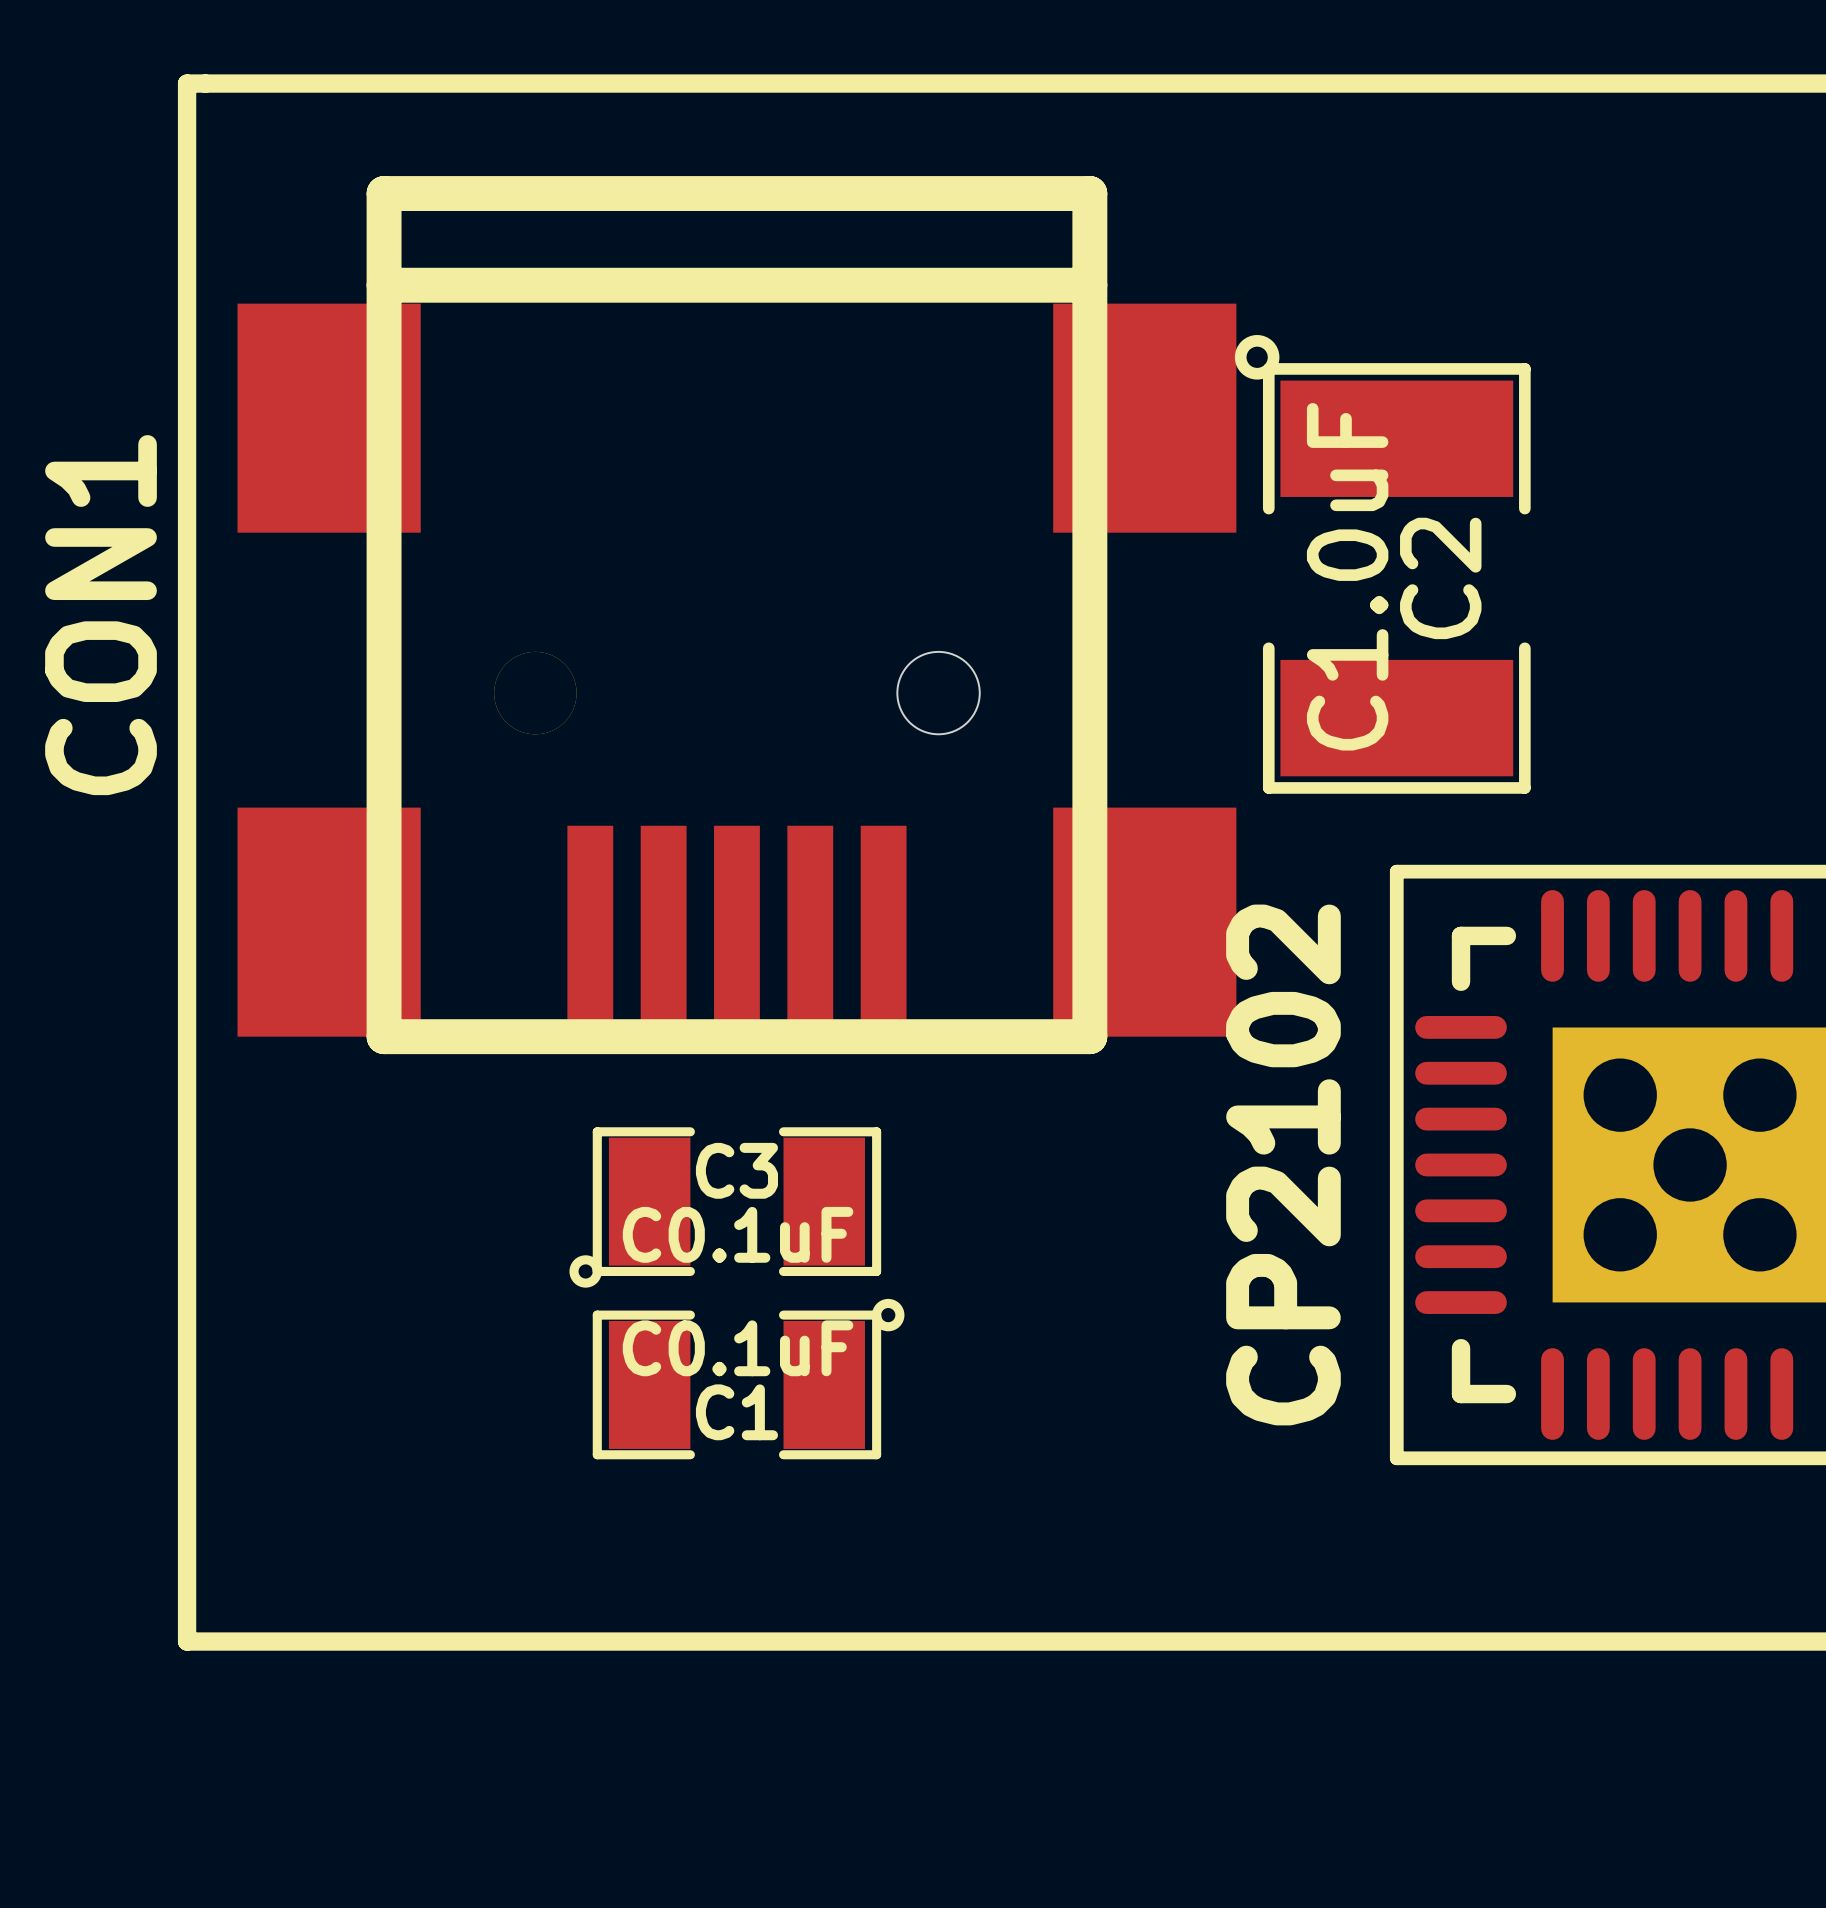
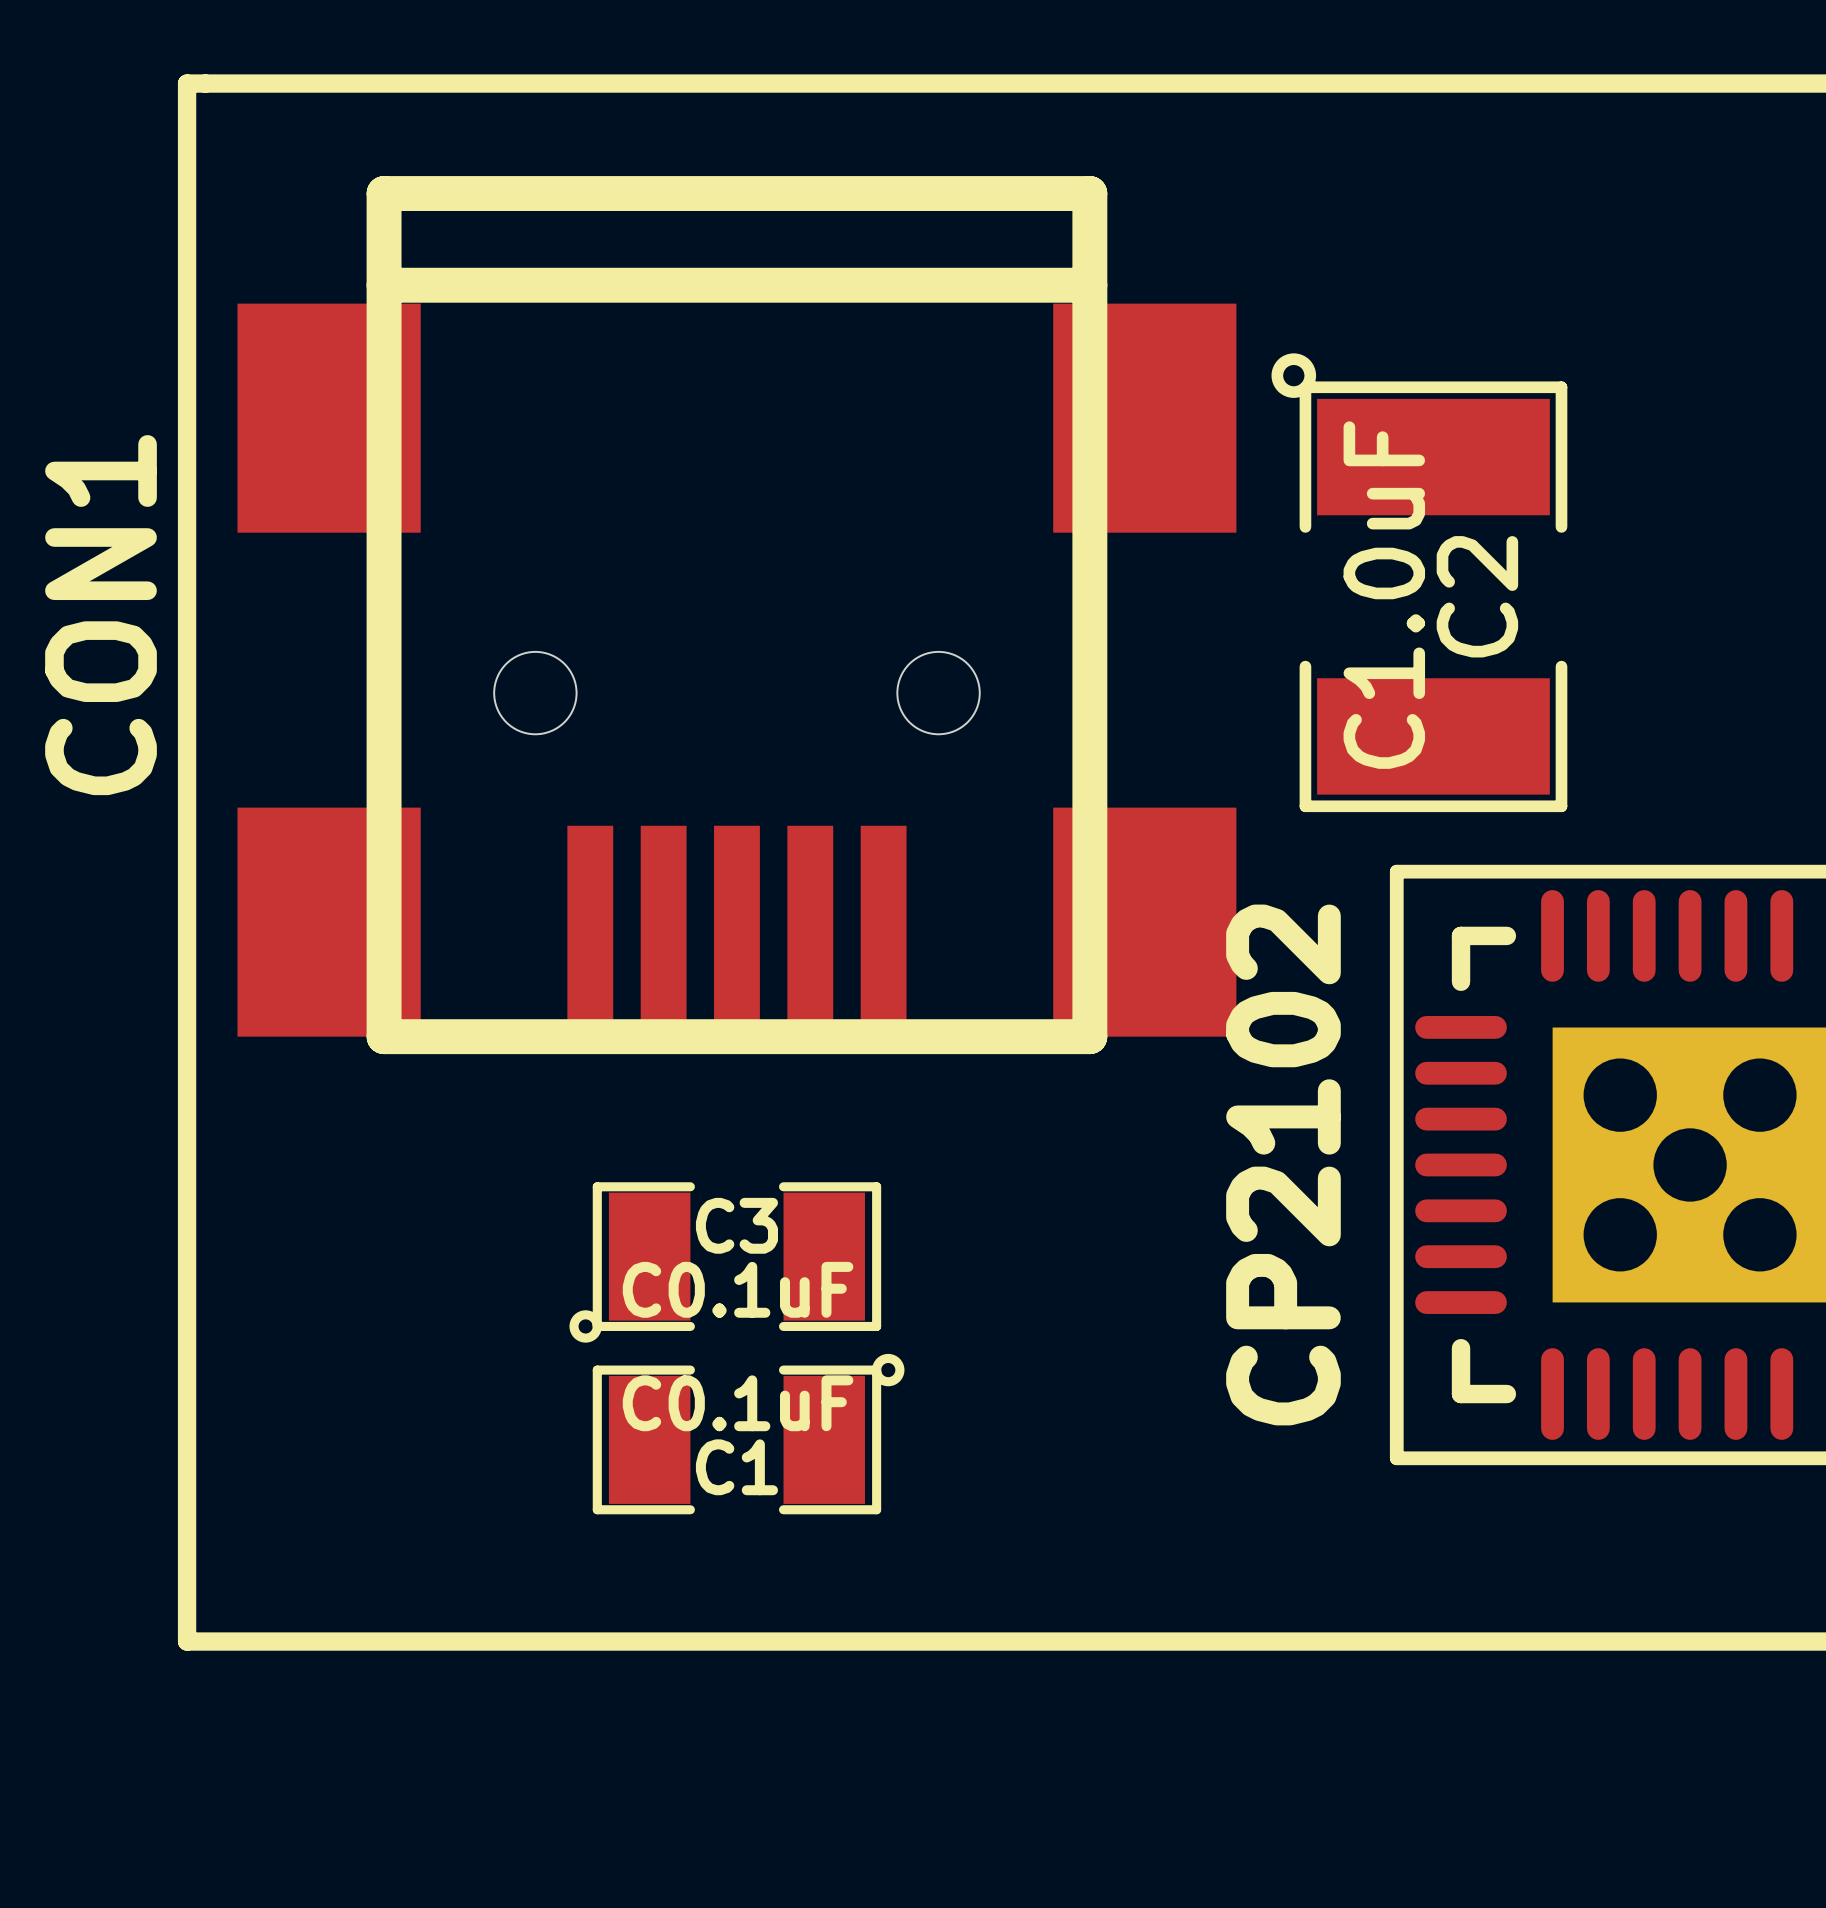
CON1 footprint: [237, 176, 1237, 1055] -> [237, 176, 1237, 1055]
C2 position: (1382, 564) -> (1419, 582)
C3 position: (725, 1207) -> (725, 1262)
C1 position: (748, 1379) -> (748, 1434)

